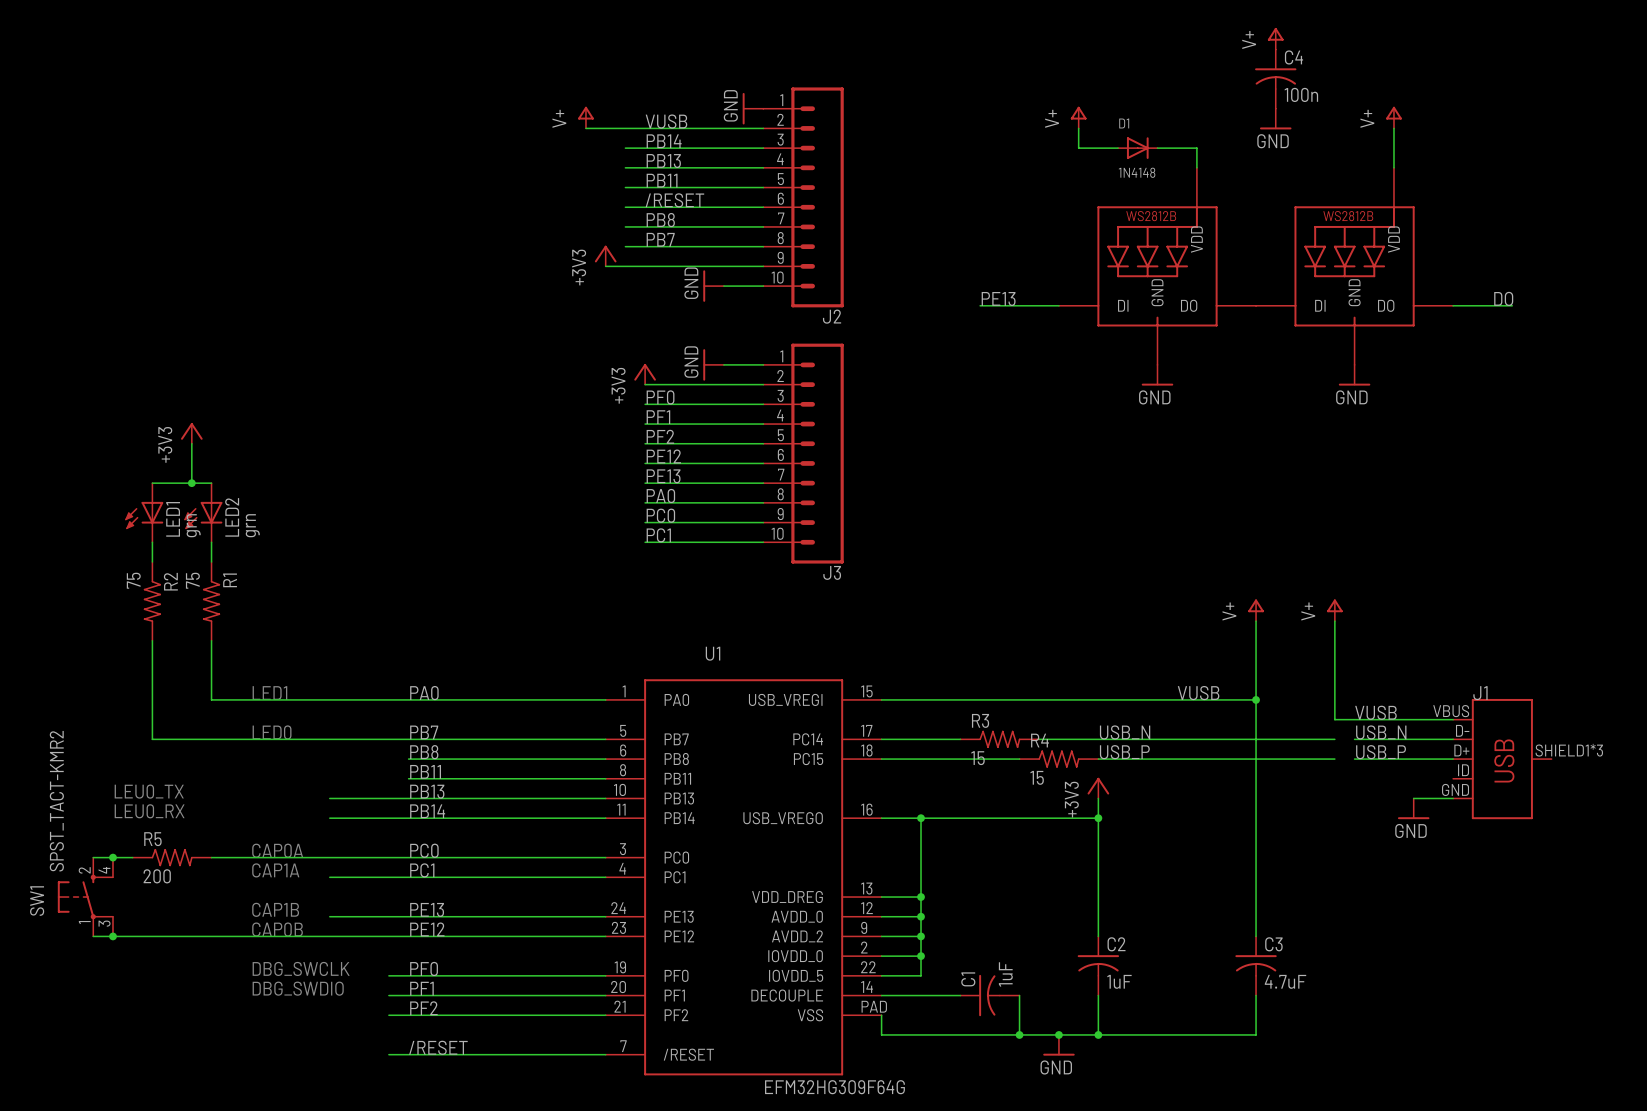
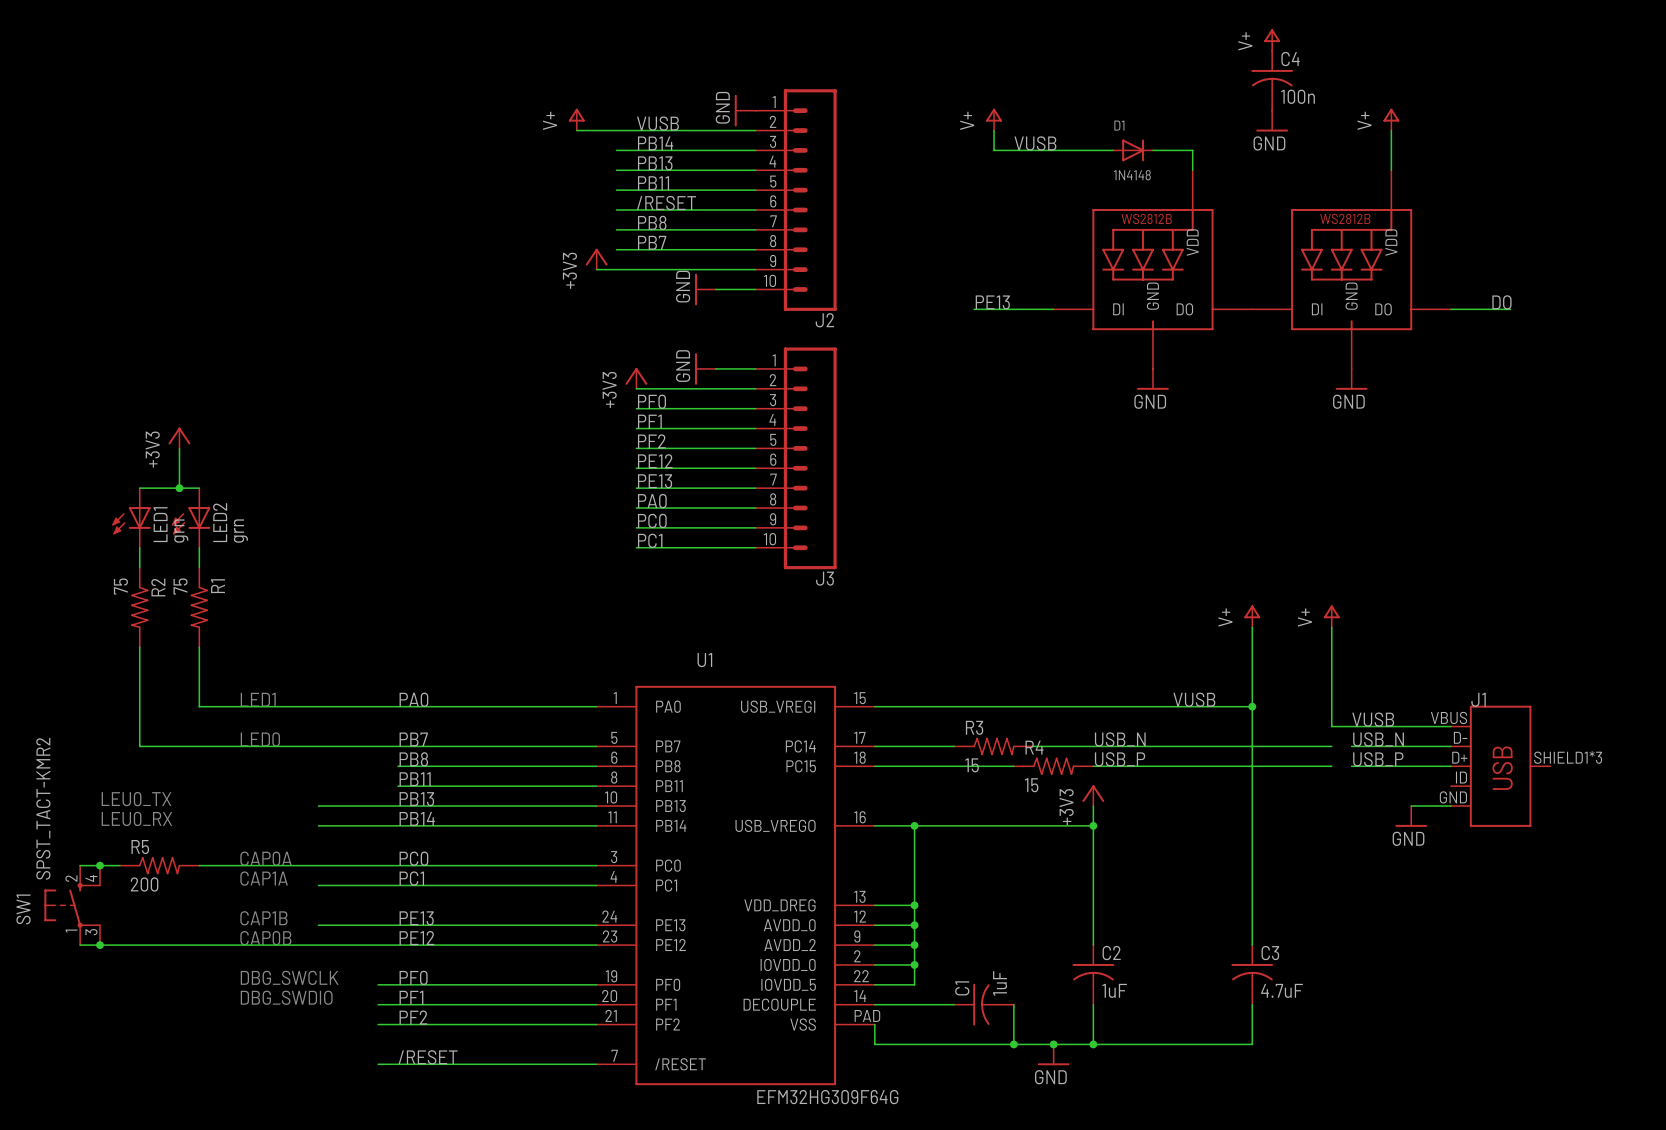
power symbol position: V+ (1078, 117) -> V+ (994, 119)
wire: (1078, 128) (1078, 148) -> (994, 130) (994, 150) (1073, 150)
label: none -> VUSB (1035, 143)

